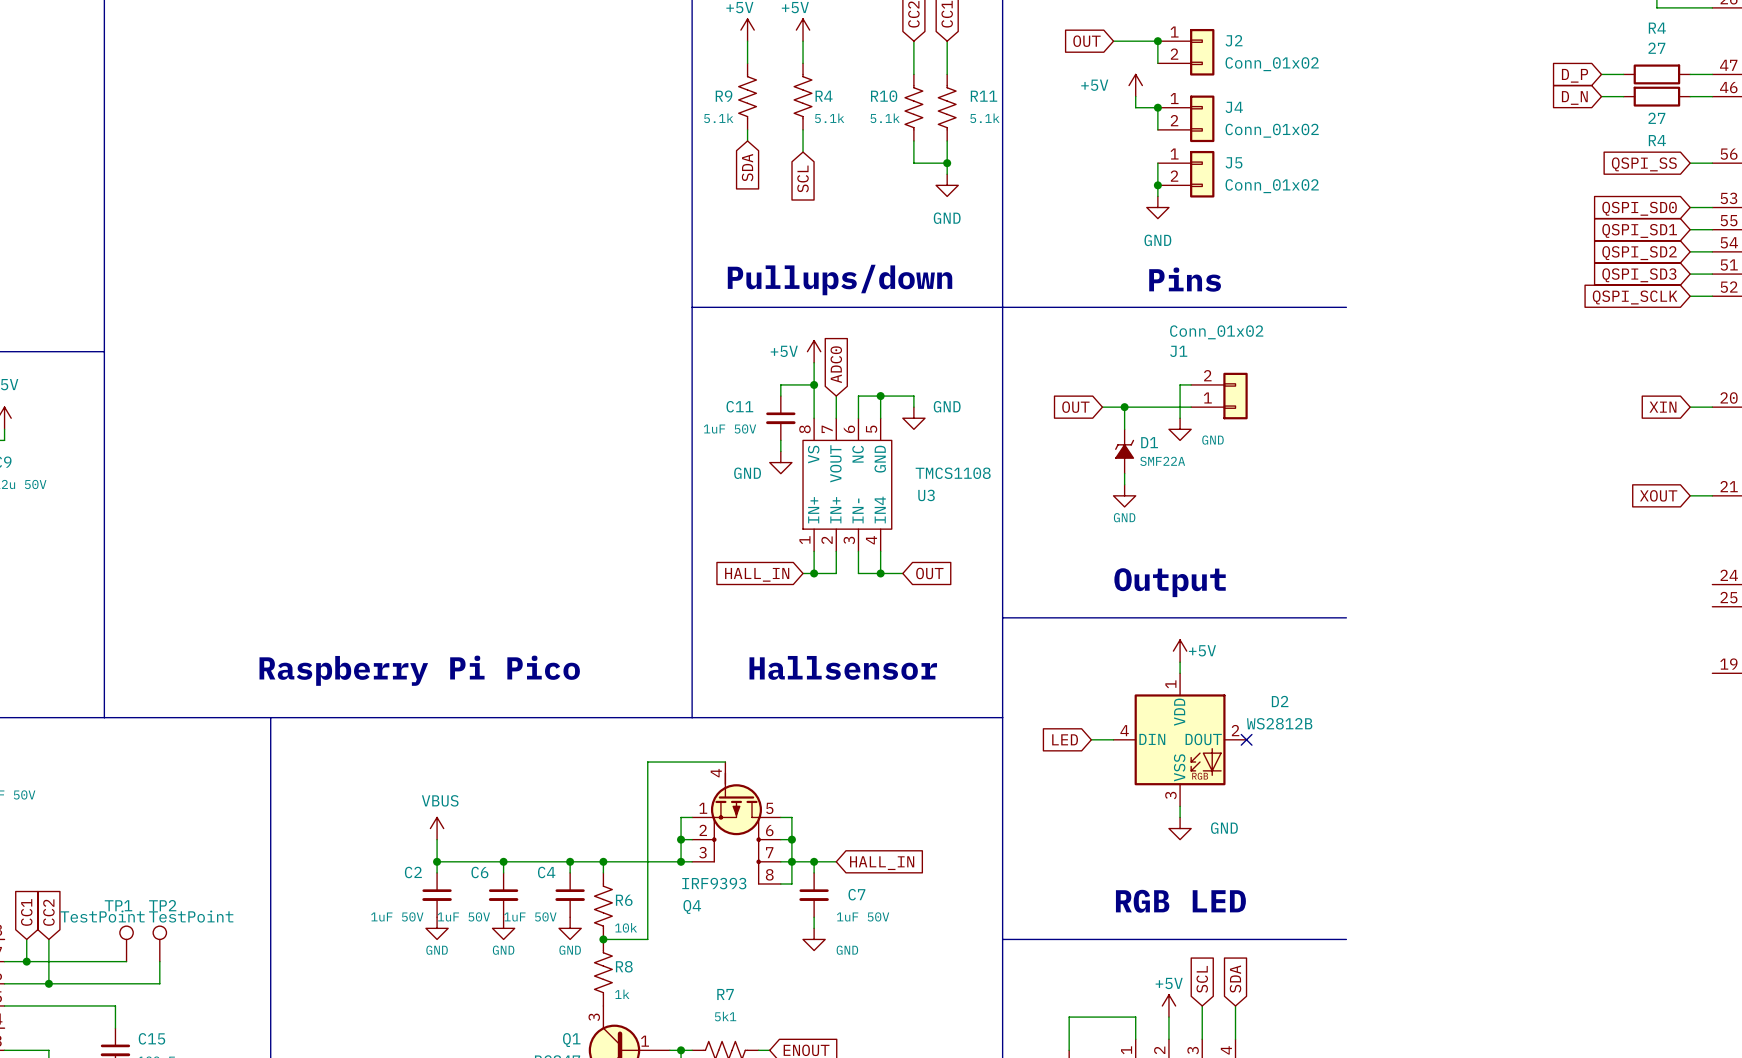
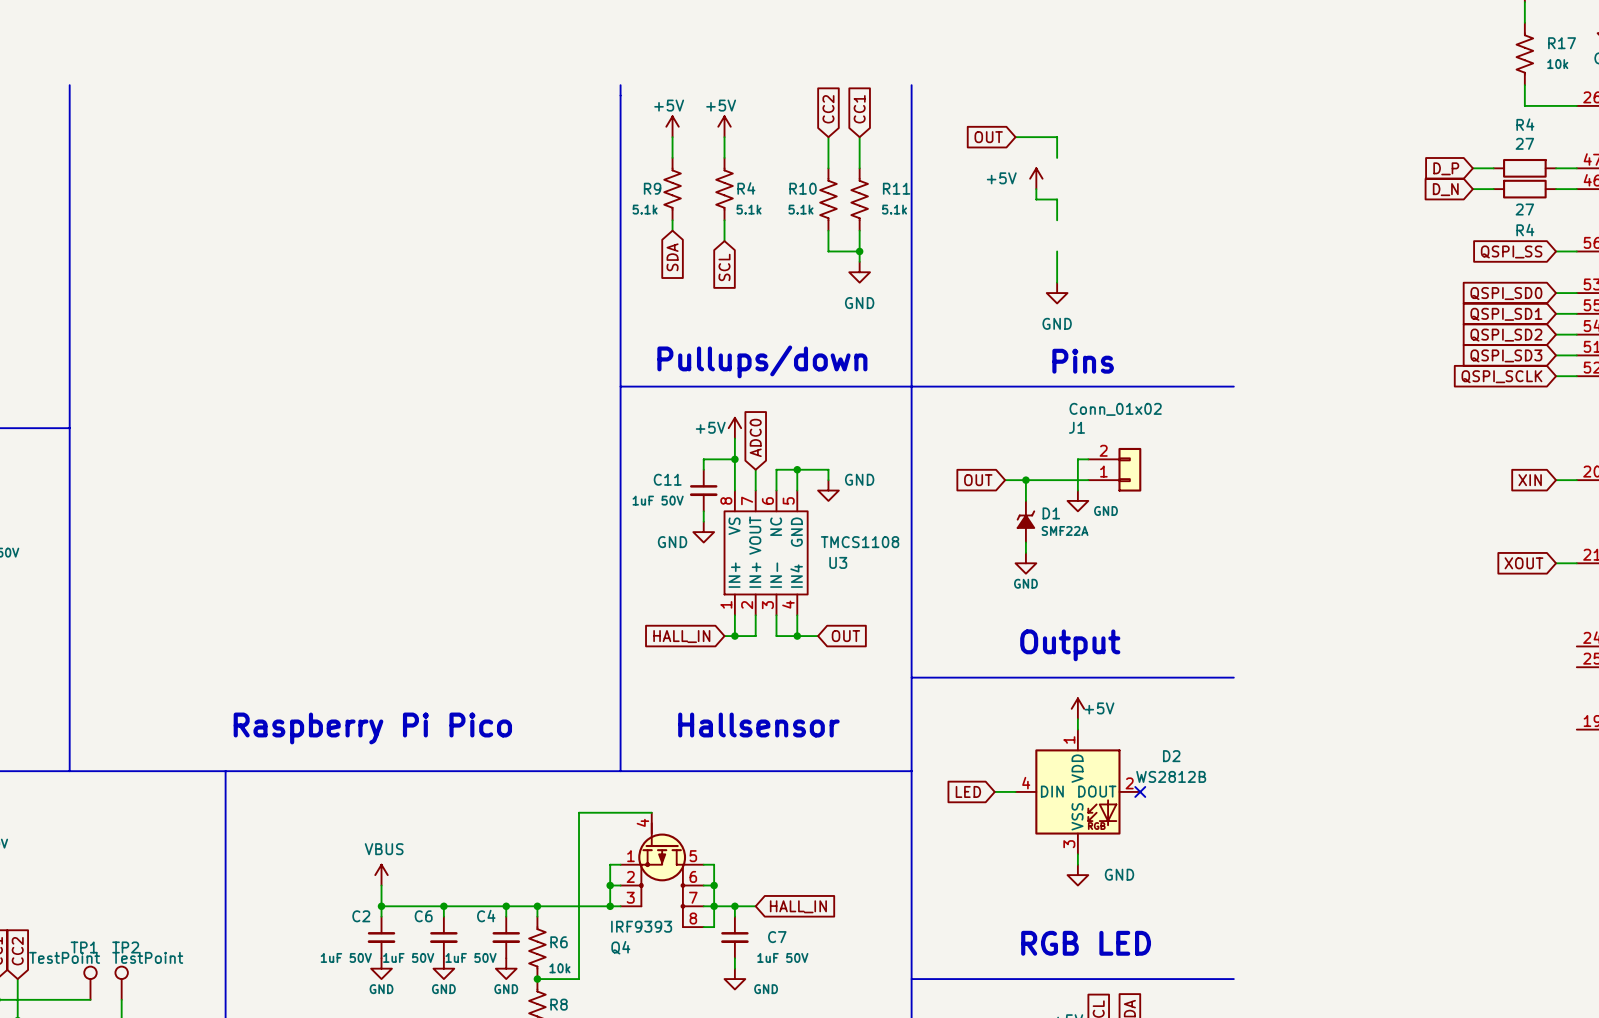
junction: (1157, 41) -> none
J2: Conn_01x02 (1186, 52) -> none
junction: (1157, 107) -> none
J4: Conn_01x02 (1186, 118) -> none
J5: Conn_01x02 (1186, 174) -> none
junction: (1157, 185) -> none

